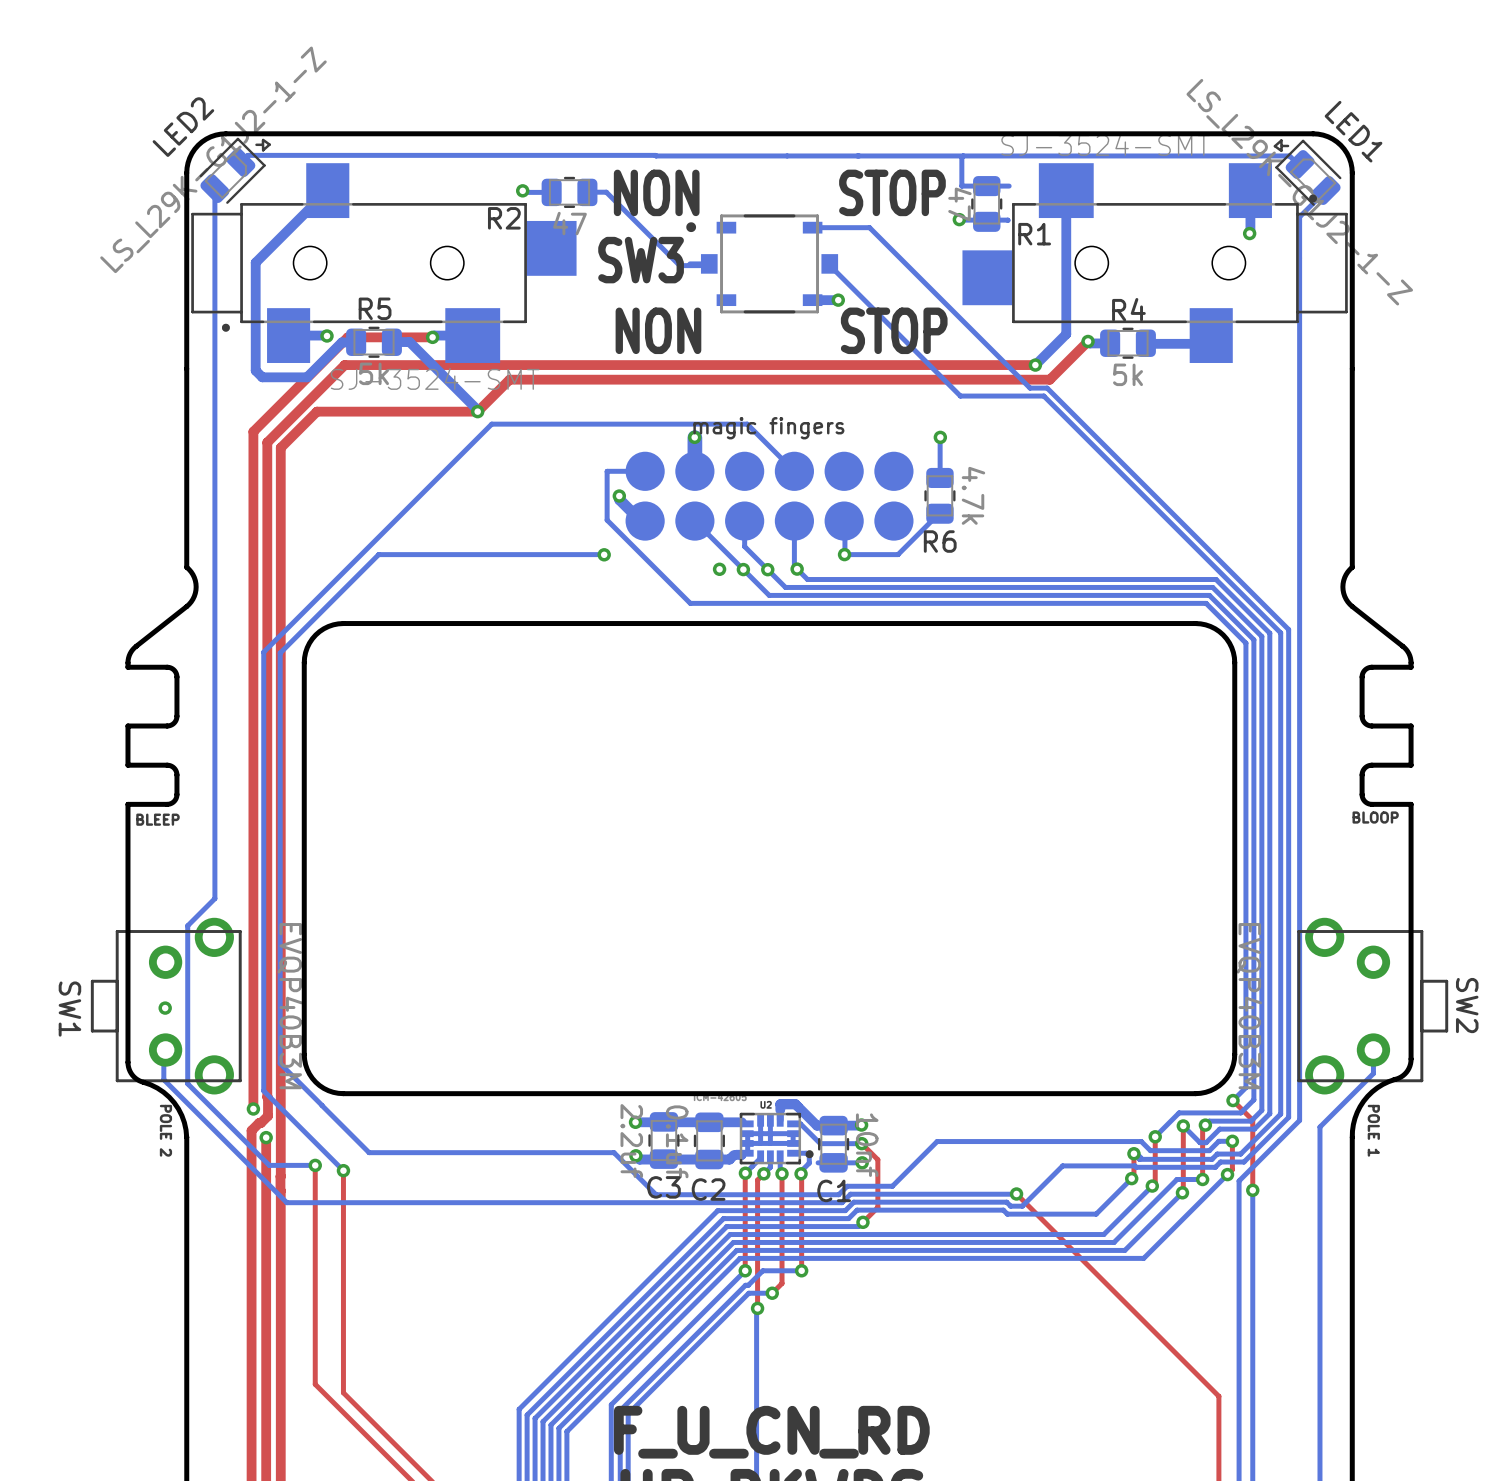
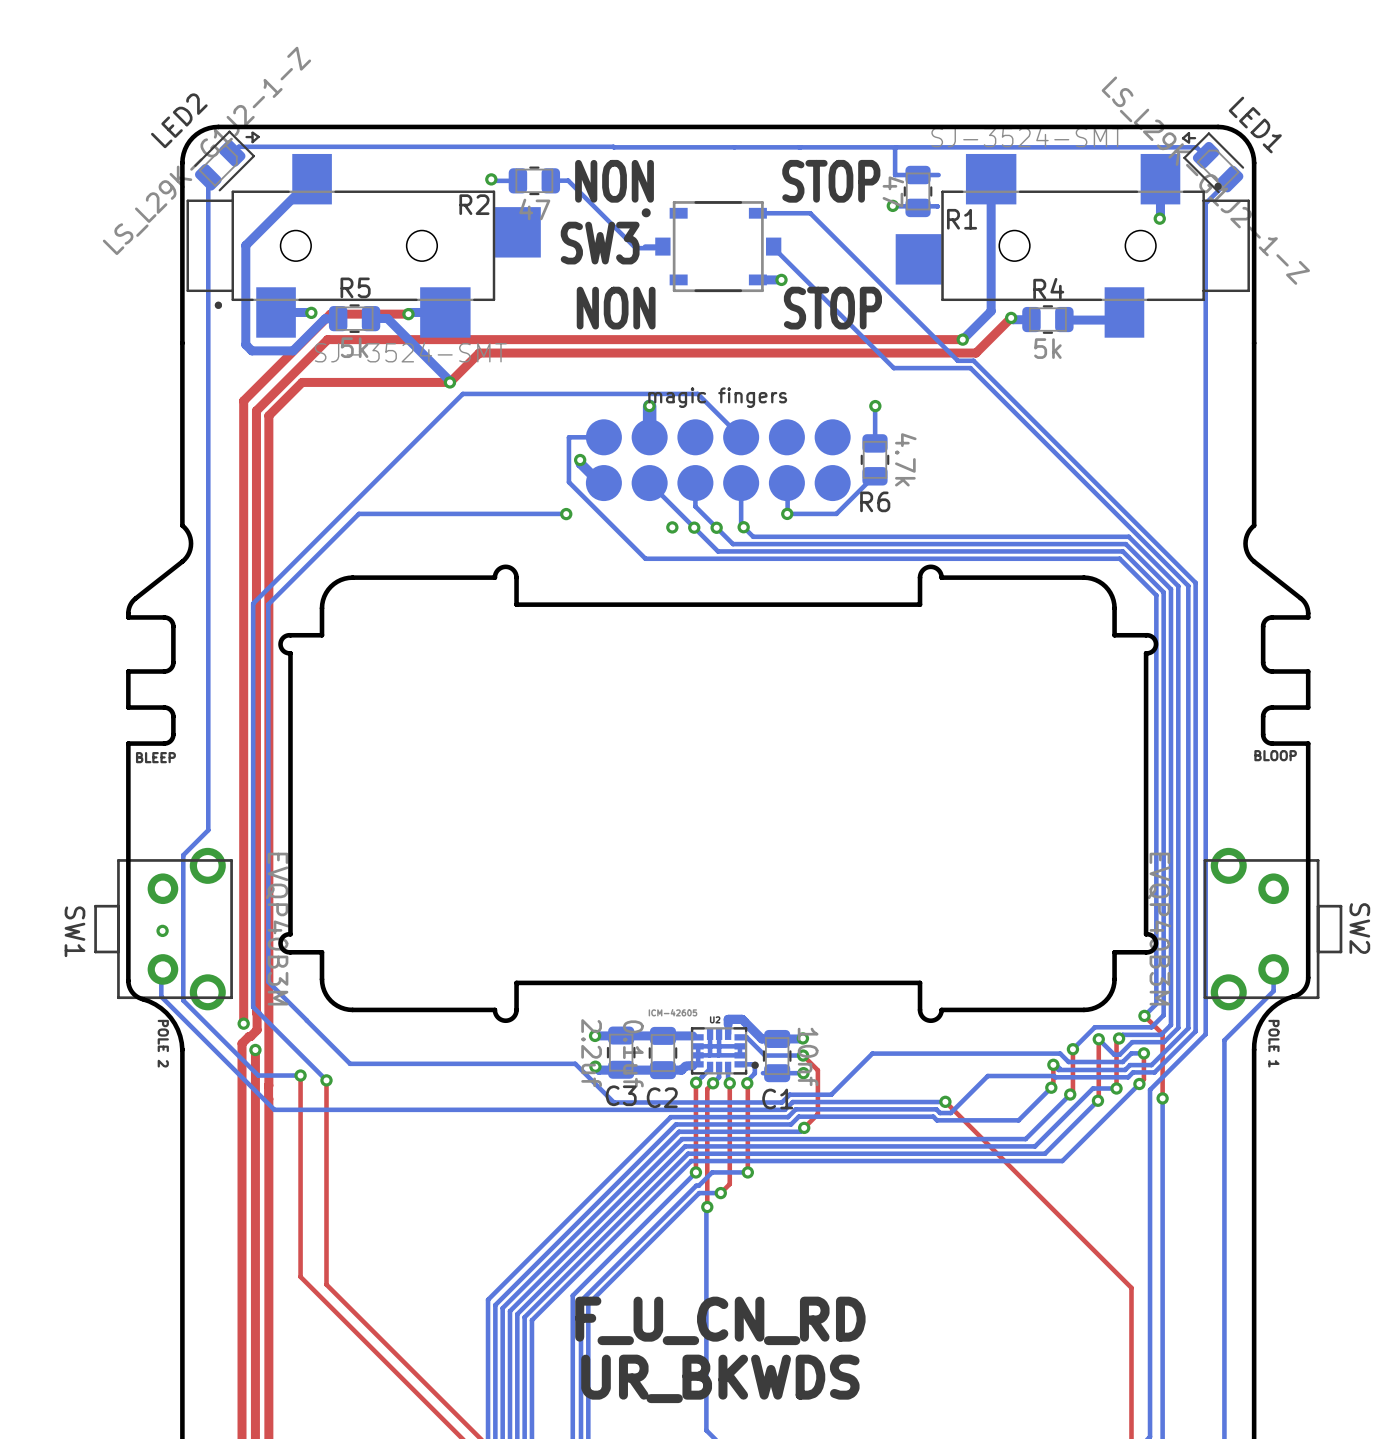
board edge: (1234, 706) (1234, 662) (1231, 647) (1223, 634) (1215, 628) (1195, 623) (338, 623) (319, 631) (307, 647) (304, 662) (304, 706) -> (1146, 653) (1152, 651) (1155, 646) (1155, 640) (1151, 636) (1114, 635) (1114, 608) (1112, 596) (1105, 586) (1095, 579) (1083, 577) (941, 577) (938, 569) (930, 566) (924, 569) (920, 574) (920, 604) (516, 604) (516, 574) (512, 569) (507, 566) (499, 569) (494, 577) (348, 577) (333, 583) (324, 596) (322, 608) (322, 635) (289, 635) (282, 638) (281, 648) (290, 653)
board edge: (1234, 1011) (1234, 1054) (1231, 1069) (1223, 1082) (1215, 1088) (1195, 1093) (338, 1093) (319, 1085) (307, 1069) (304, 1054) (304, 1011) -> (1146, 934) (1154, 938) (1154, 948) (1147, 952) (1114, 952) (1114, 979) (1112, 991) (1102, 1003) (1087, 1009) (941, 1009) (937, 1018) (929, 1020) (924, 1018) (920, 1012) (920, 982) (516, 982) (516, 1012) (512, 1018) (505, 1020) (498, 1017) (494, 1009) (352, 1009) (340, 1007) (330, 1000) (324, 991) (322, 979) (322, 952) (284, 951) (280, 945) (281, 939) (284, 935) (290, 934)

